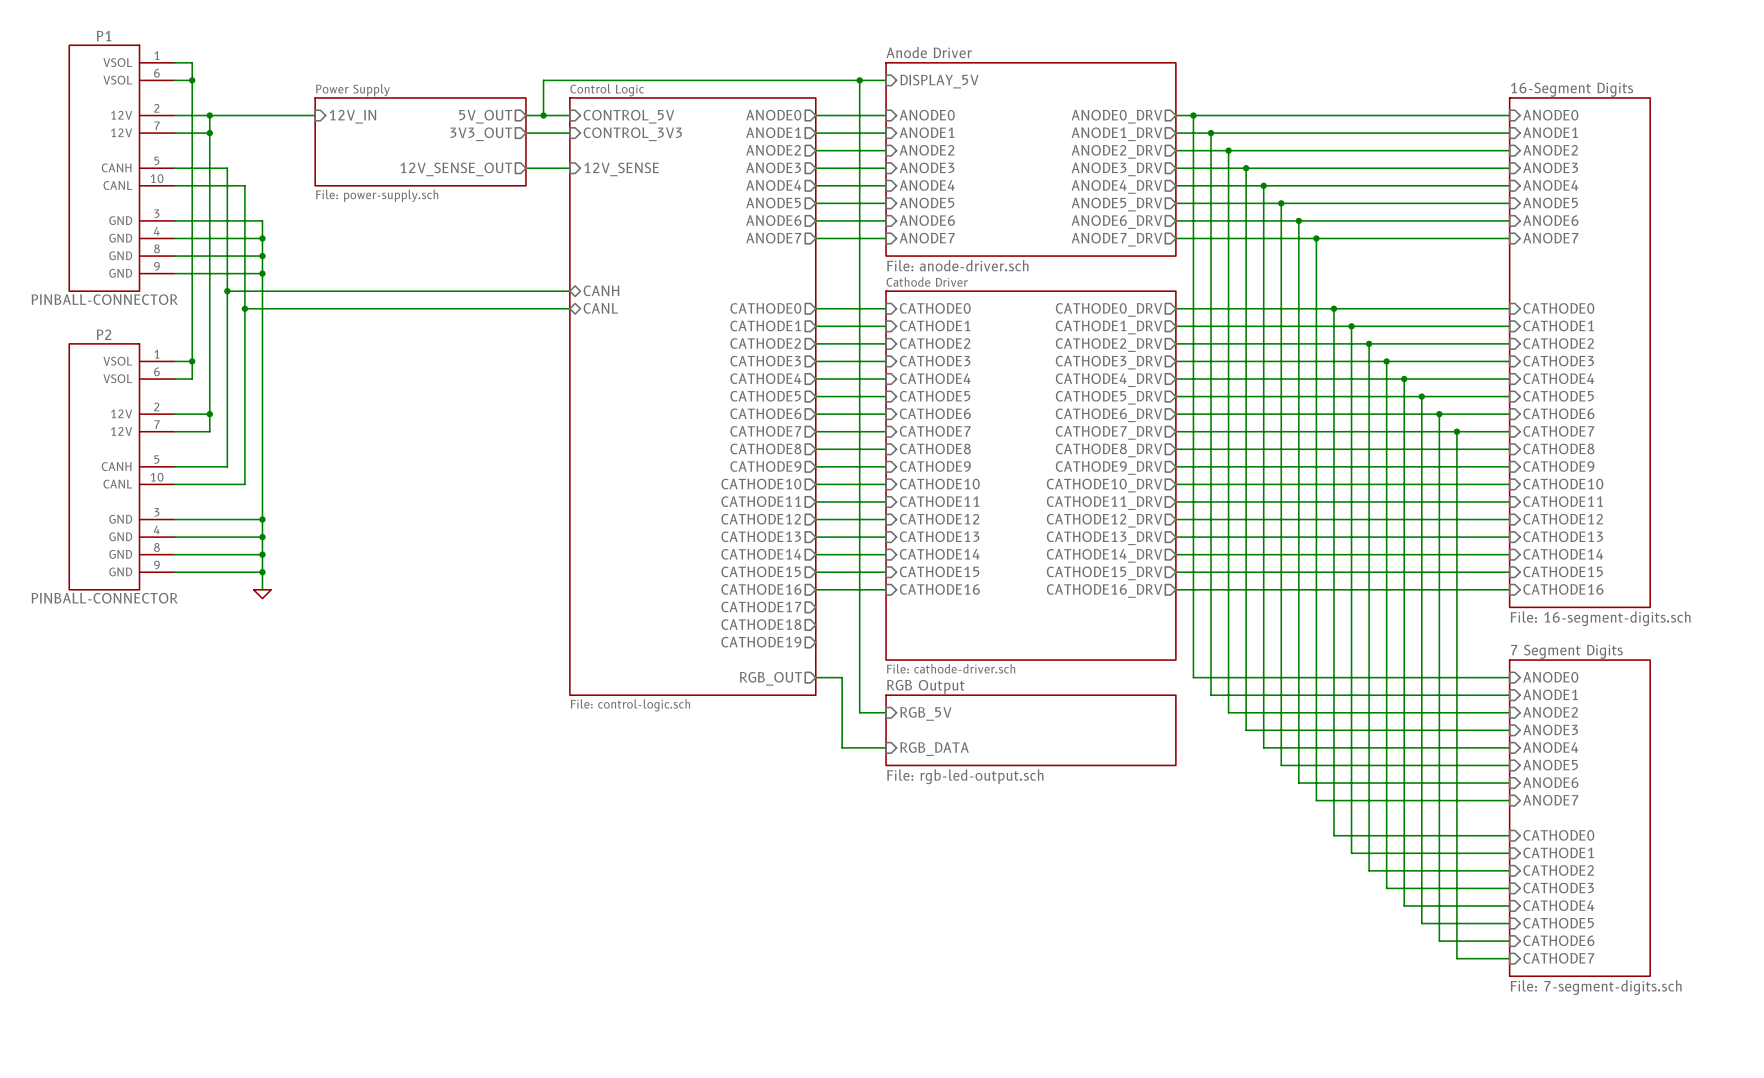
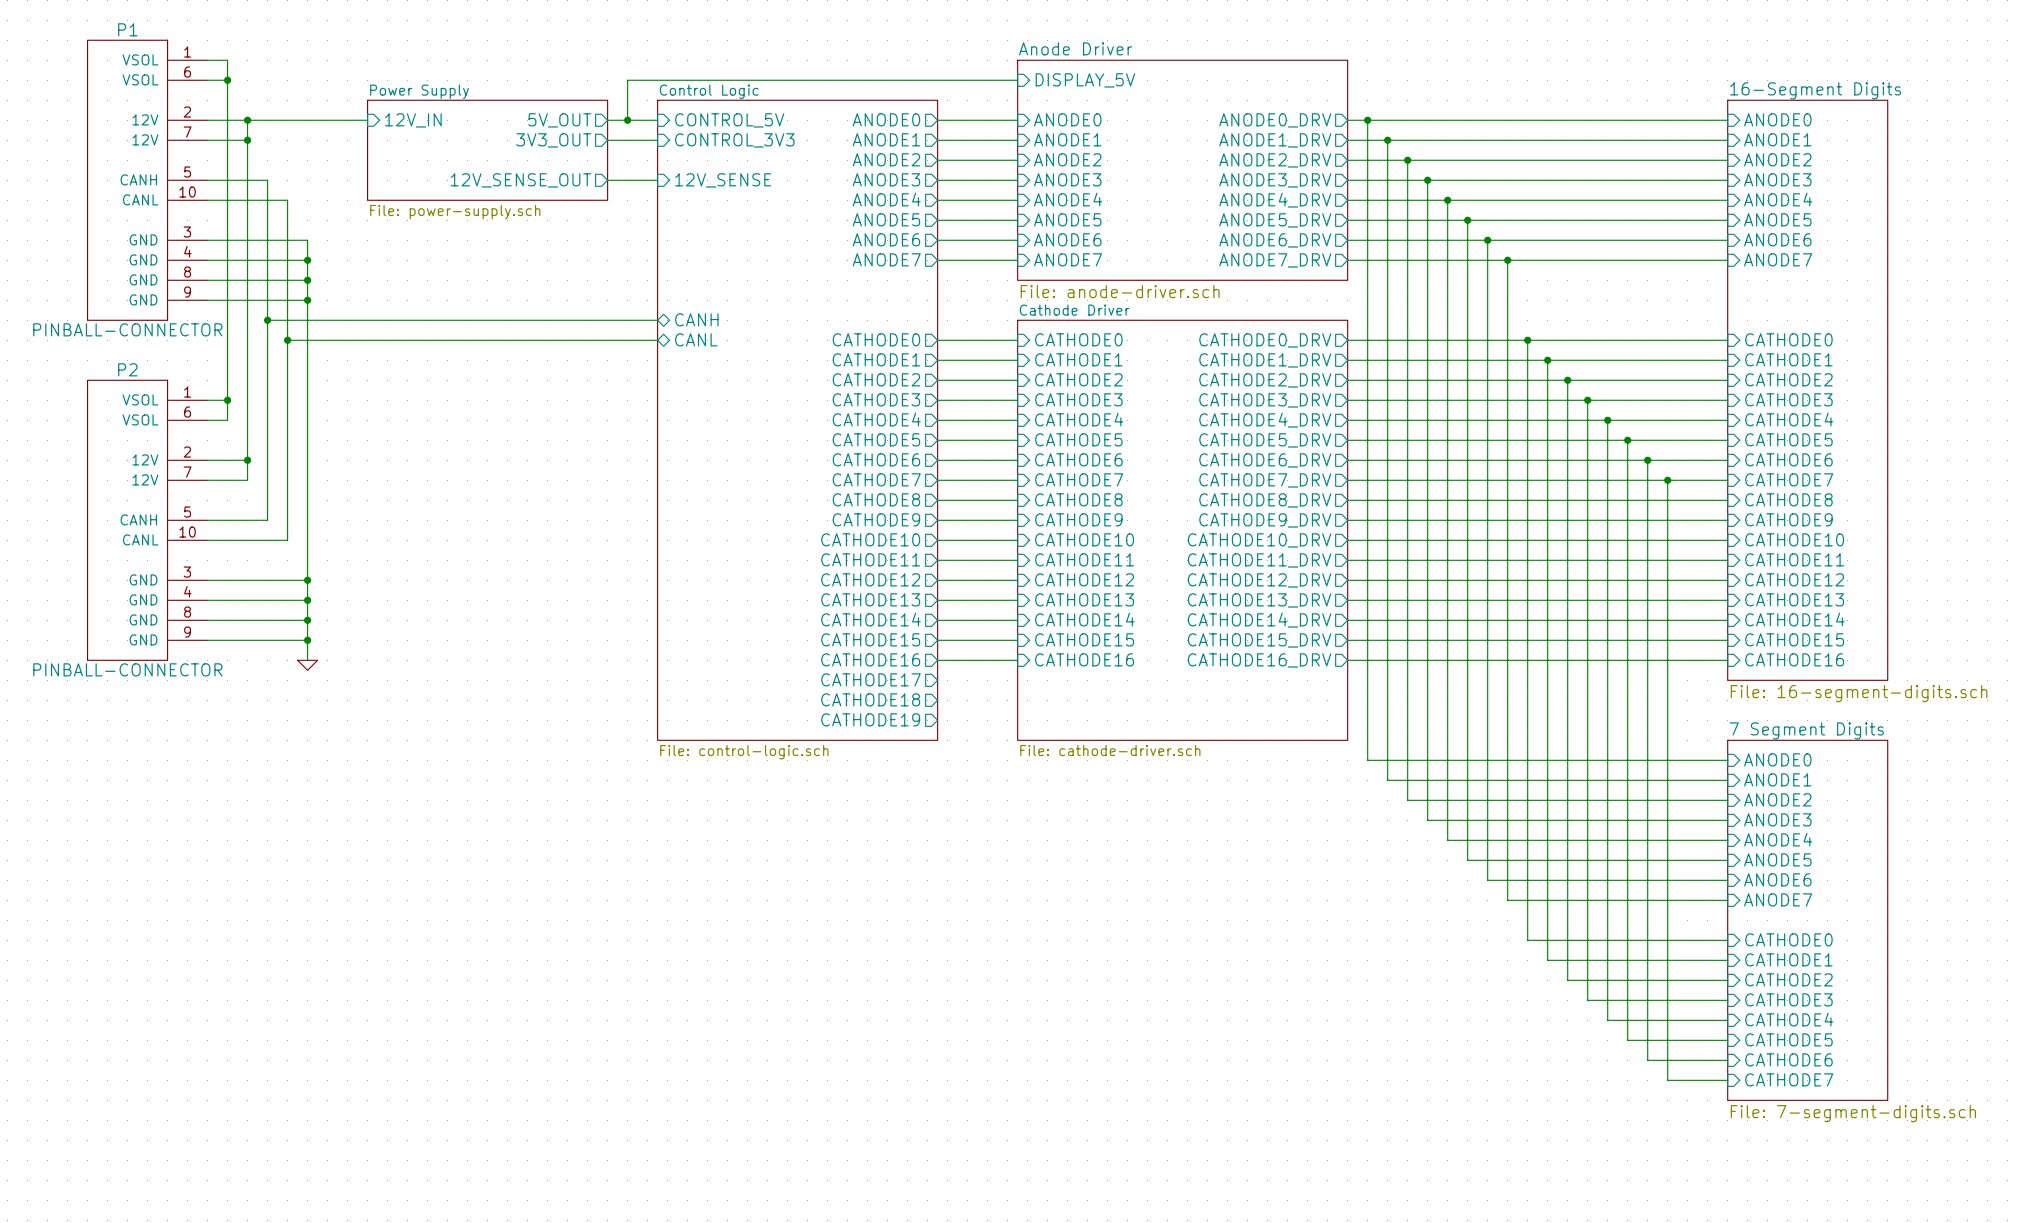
wire: (859, 80) (859, 712) (886, 712) -> none
junction: (859, 80) -> none
sheet Control Logic: none -> File: control-logic.sch (797, 420)
sheet Control Logic: File: control-logic.sch (692, 396) -> none
wire: (815, 677) (842, 677) (842, 747) (886, 747) -> none
sheet pin: RGB_OUT (770, 678) -> none
sheet pin: RGB_5V (925, 713) -> none
sheet RGB Output: File: rgb-led-output.sch (1030, 730) -> none
sheet pin: RGB_DATA (934, 749) -> none

